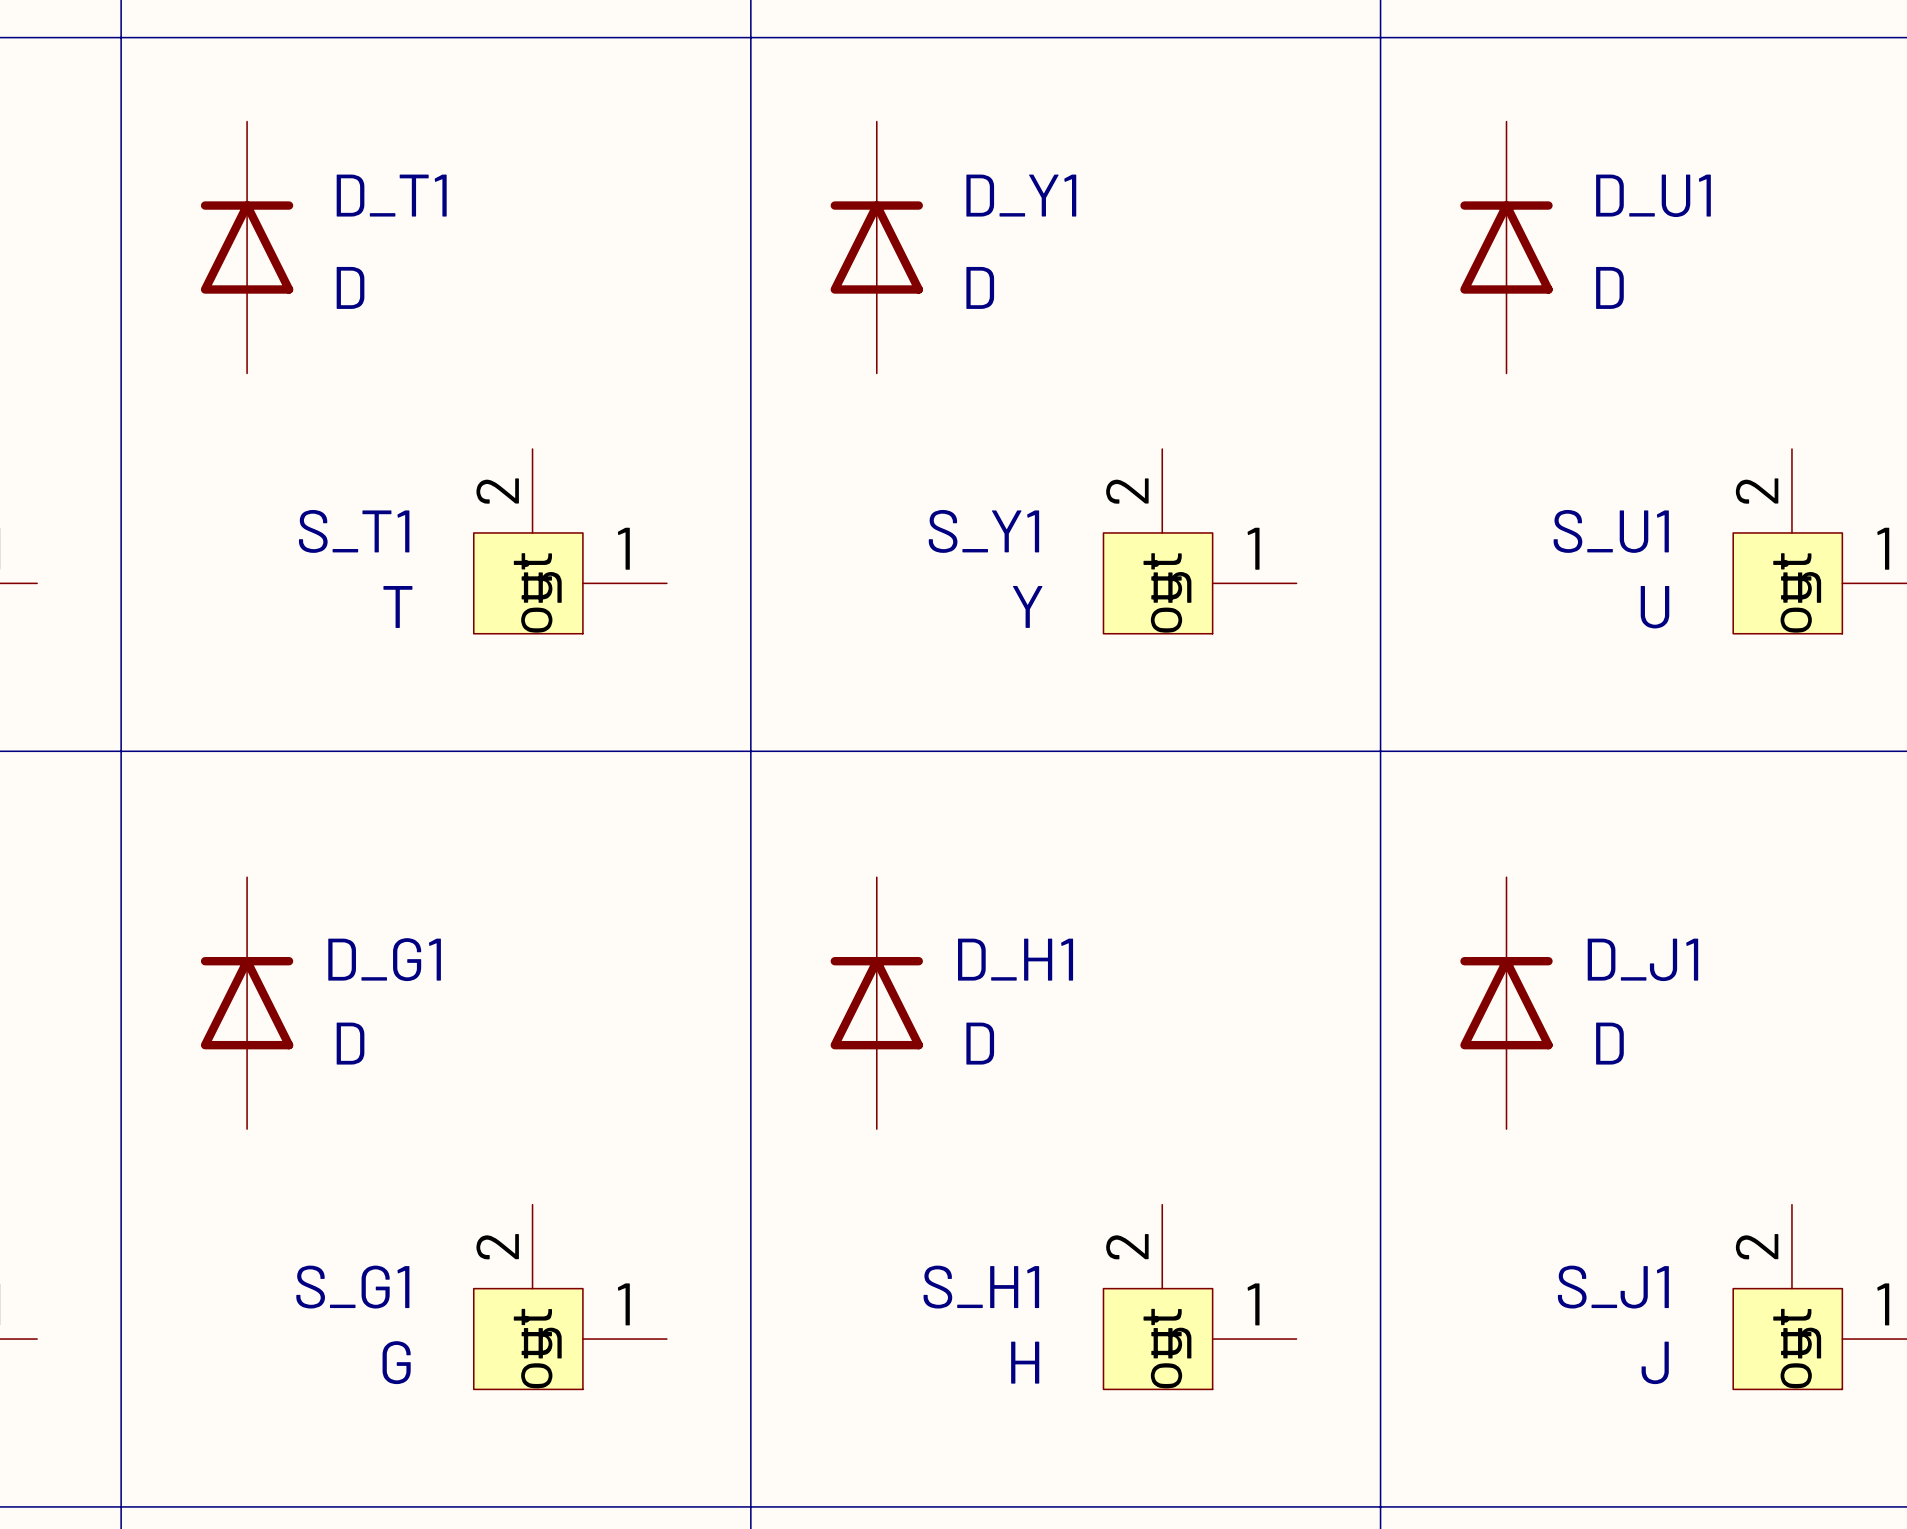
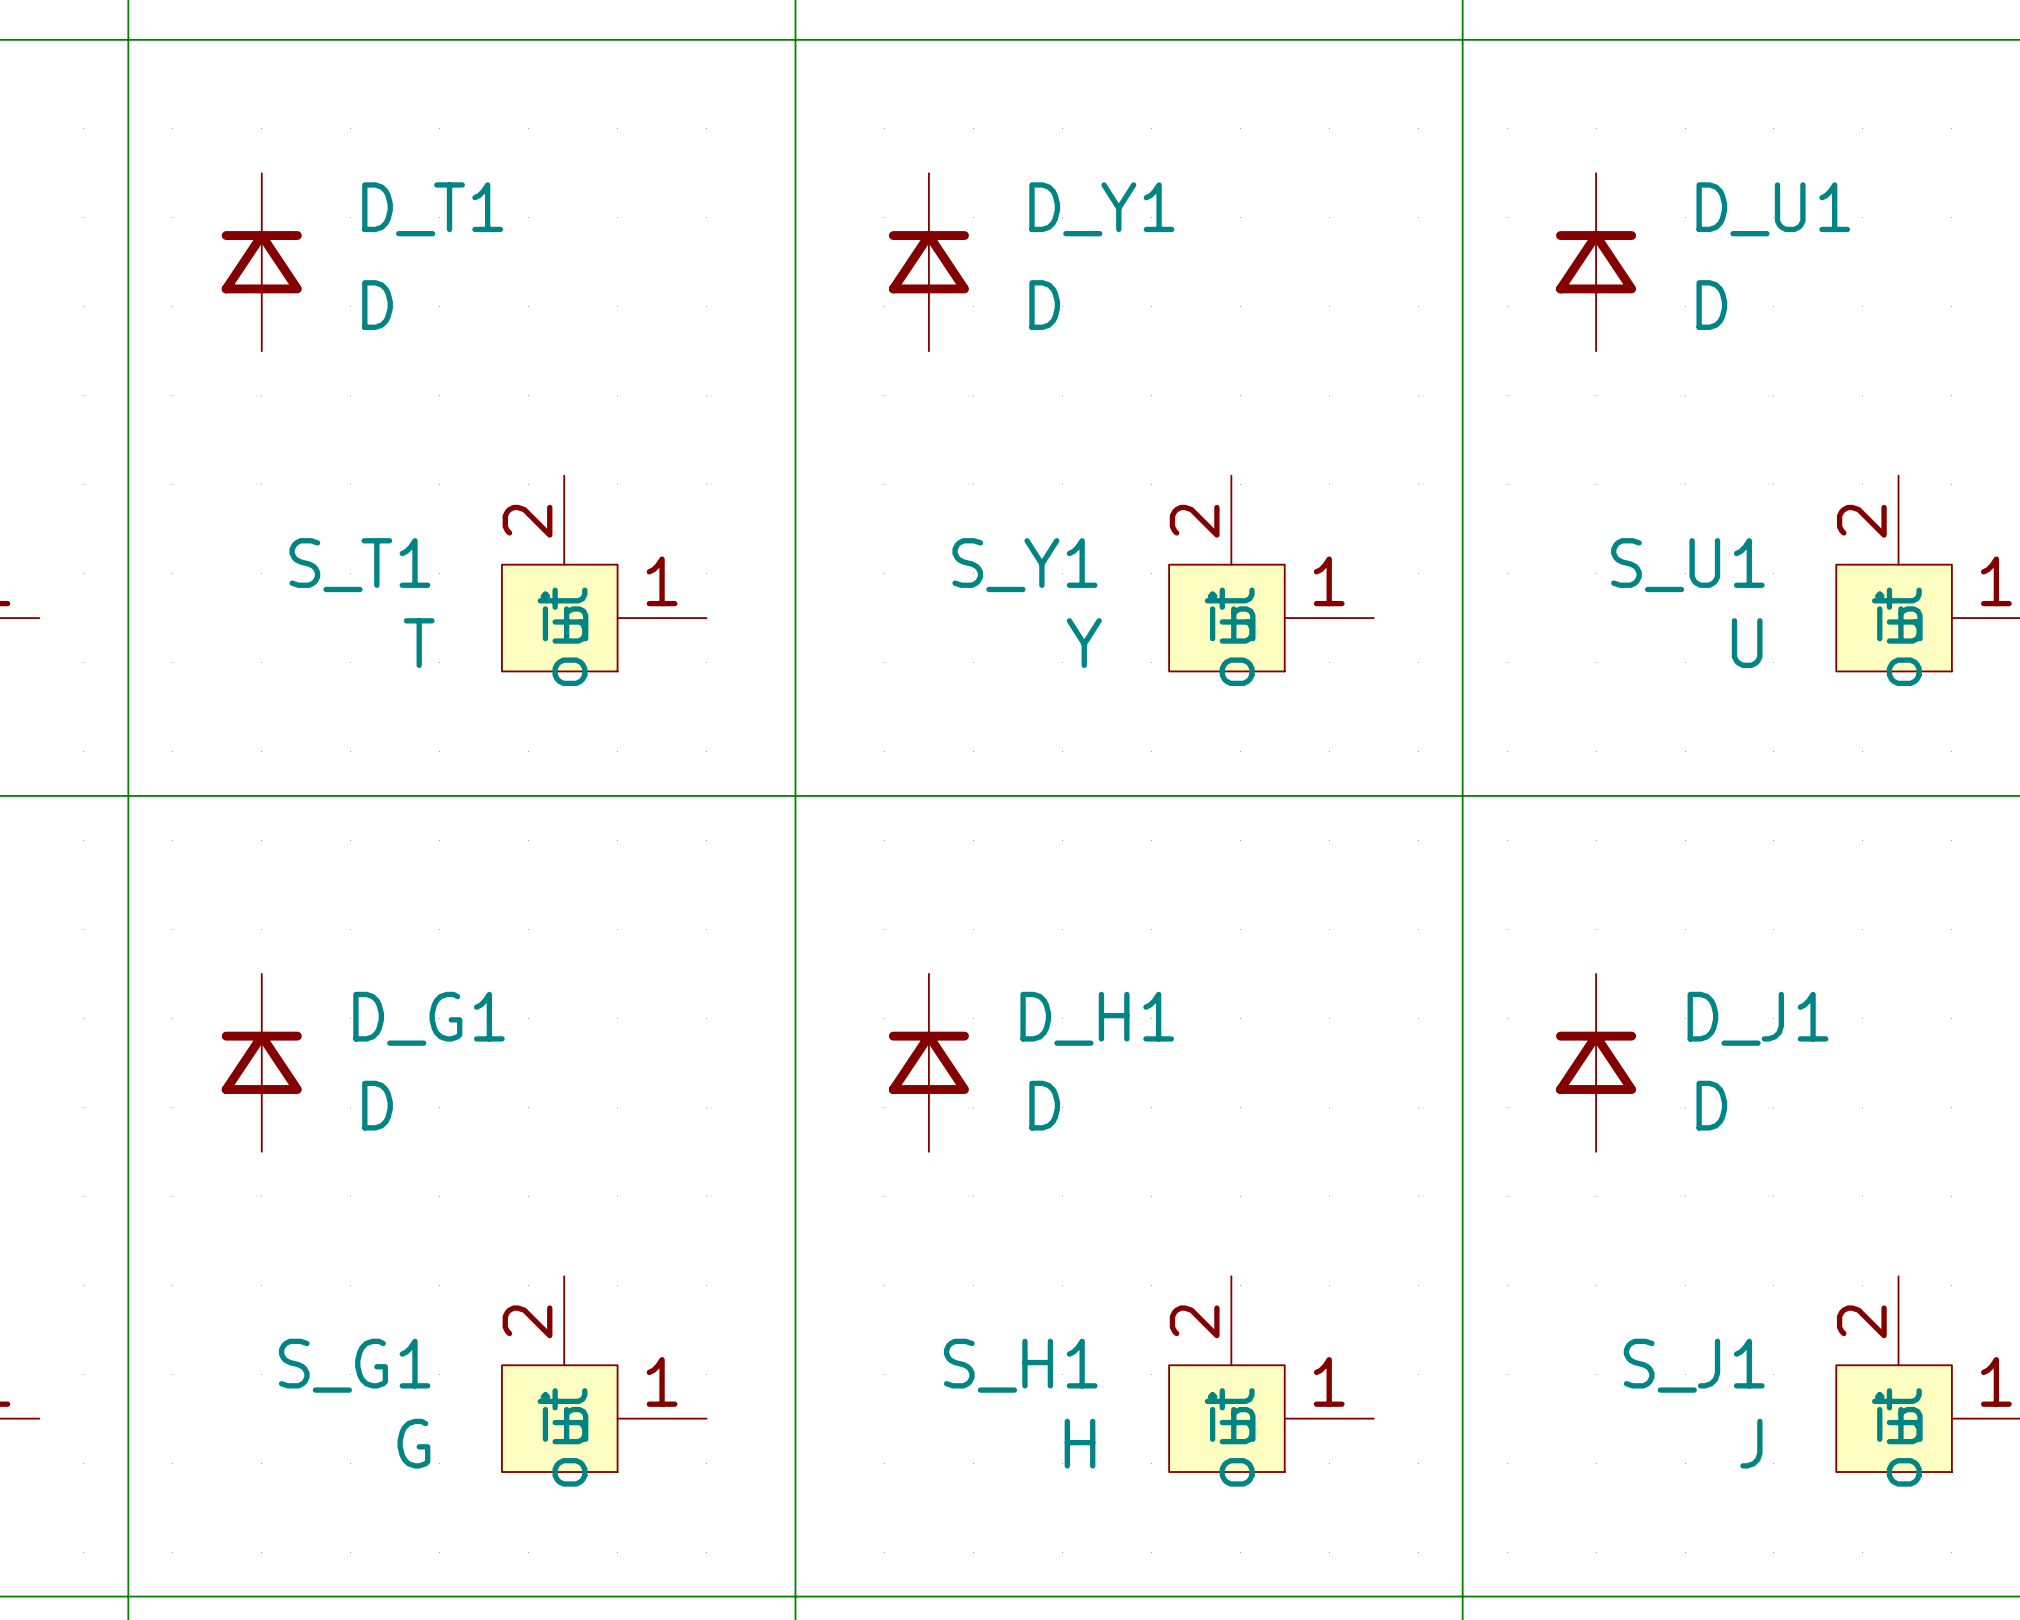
D_T1 symbol: [200, 121, 294, 374] -> [221, 173, 302, 352]
D_Y1 symbol: [830, 121, 923, 374] -> [888, 173, 969, 352]
D_U1 symbol: [1460, 121, 1553, 374] -> [1556, 173, 1637, 352]
D_G1 symbol: [200, 877, 294, 1130] -> [221, 973, 302, 1152]
D_H1 symbol: [830, 877, 923, 1130] -> [888, 973, 969, 1152]
D_J1 symbol: [1460, 877, 1553, 1130] -> [1556, 973, 1637, 1152]

